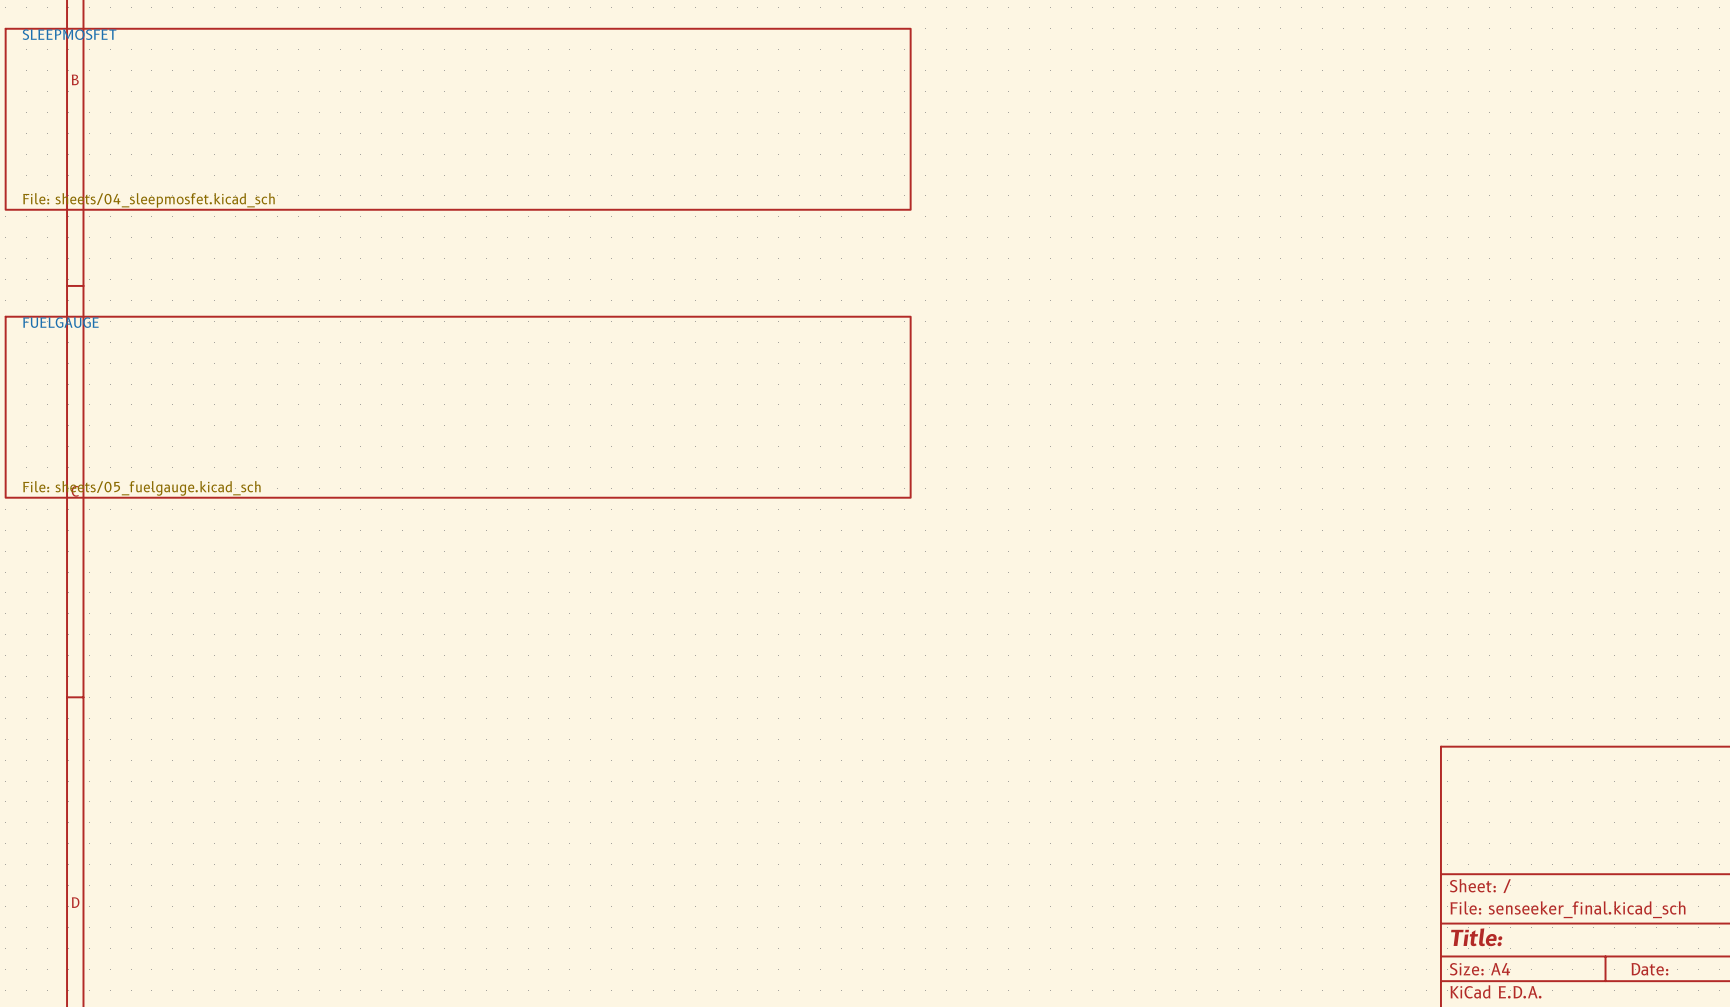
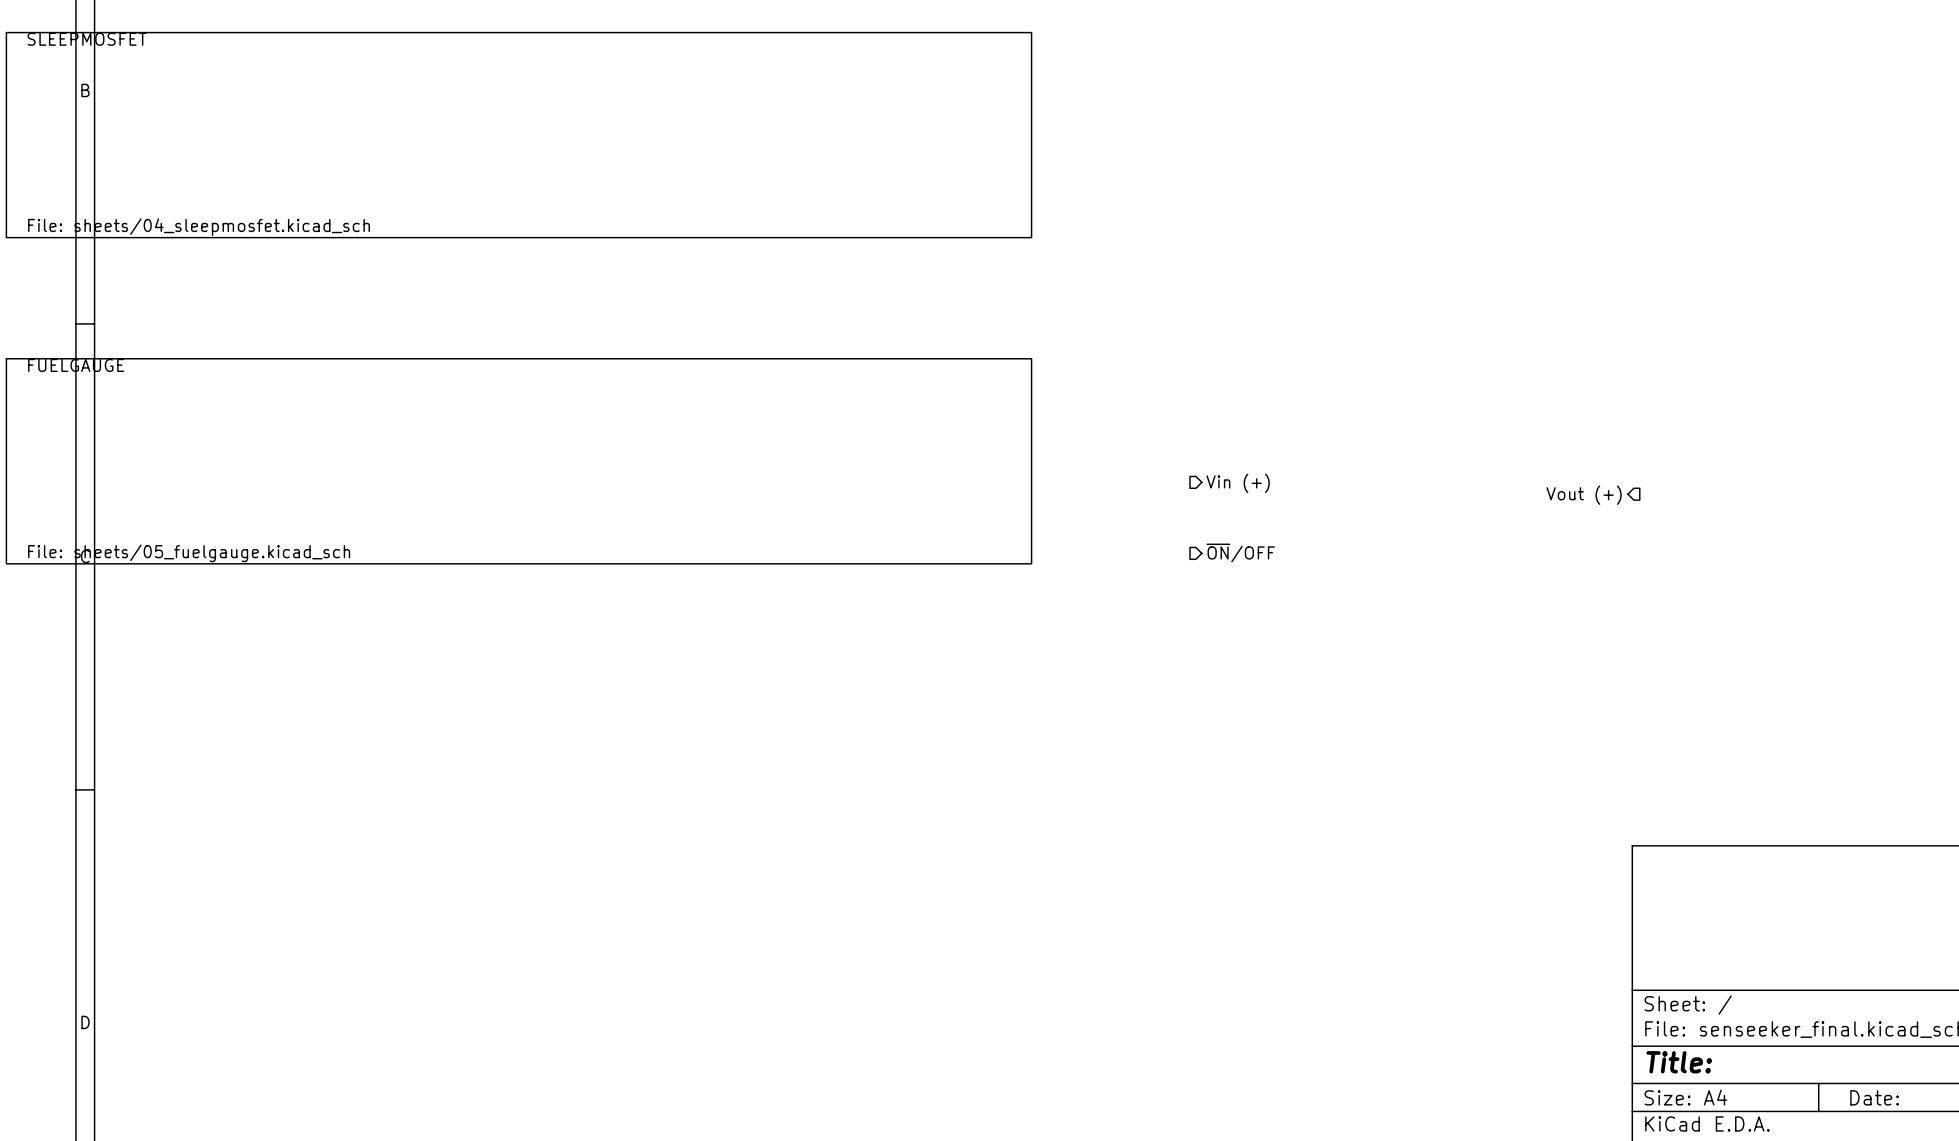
sheet pin: none -> Vin (+) (1238, 483)
sheet pin: none -> Vout (+) (1584, 495)
sheet pin: none -> ~{ON}/OFF (1240, 552)

